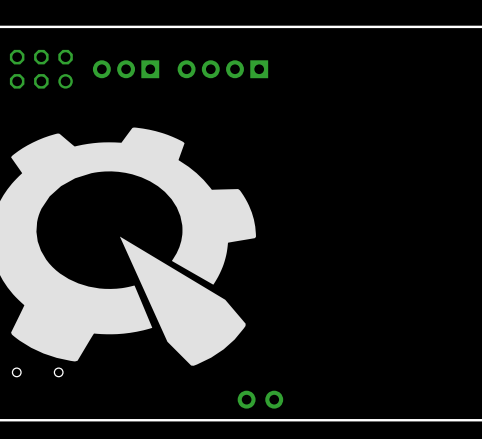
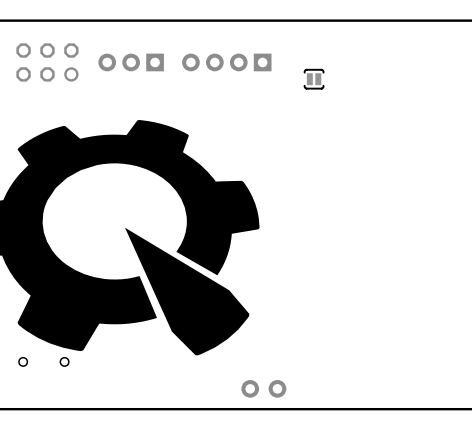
part: none -> (314, 79)

